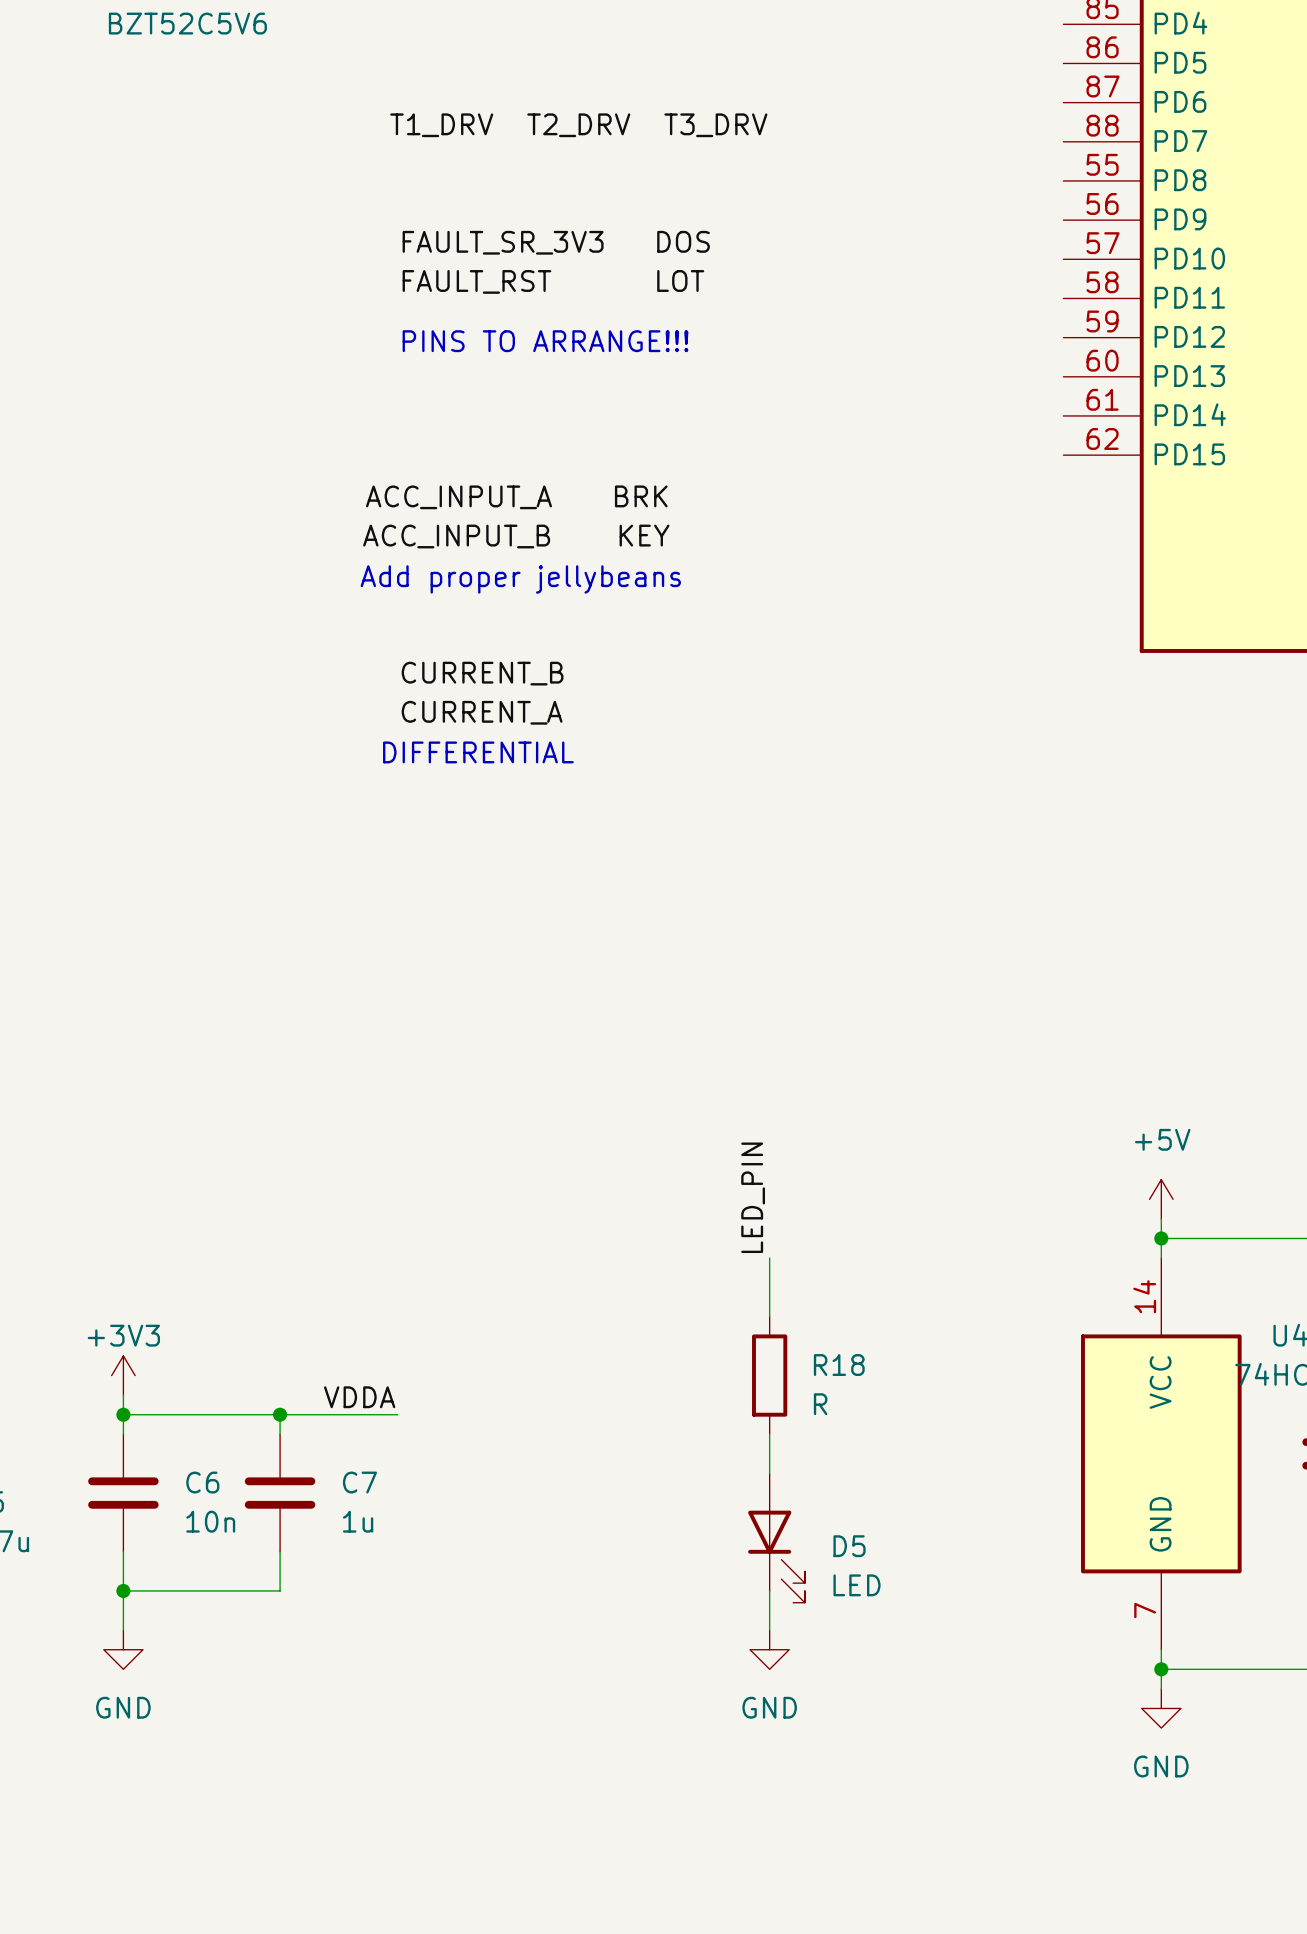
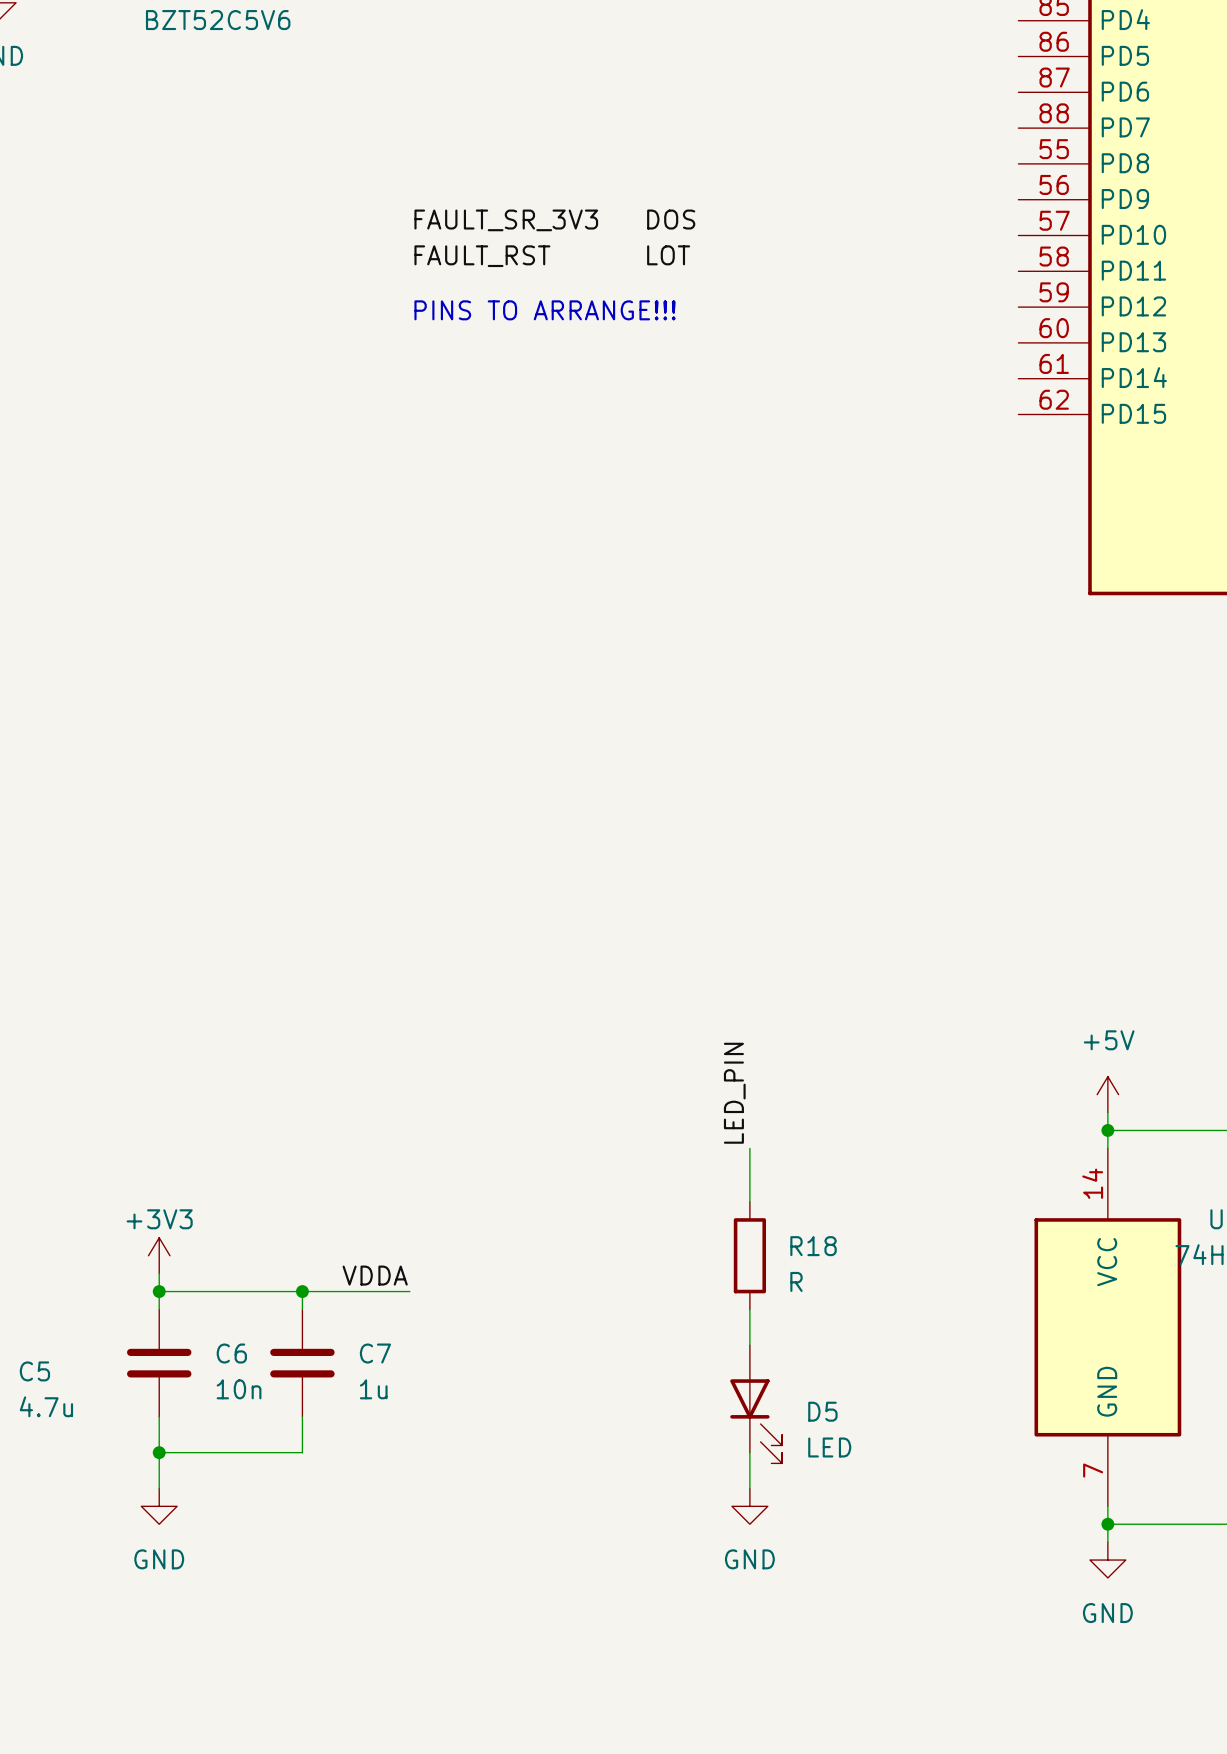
label: T1_DRV (441, 125) -> none
label: T2_DRV (578, 125) -> none
label: T3_DRV (715, 125) -> none
label: BRK (641, 496) -> none
label: ACC_INPUT_A (458, 497) -> none
label: KEY (644, 535) -> none
label: ACC_INPUT_B (456, 536) -> none
text: Add proper jellybeans (520, 579) -> none
label: CURRENT_B (482, 673) -> none
label: CURRENT_A (482, 712) -> none
text: DIFFERENTIAL (478, 752) -> none

